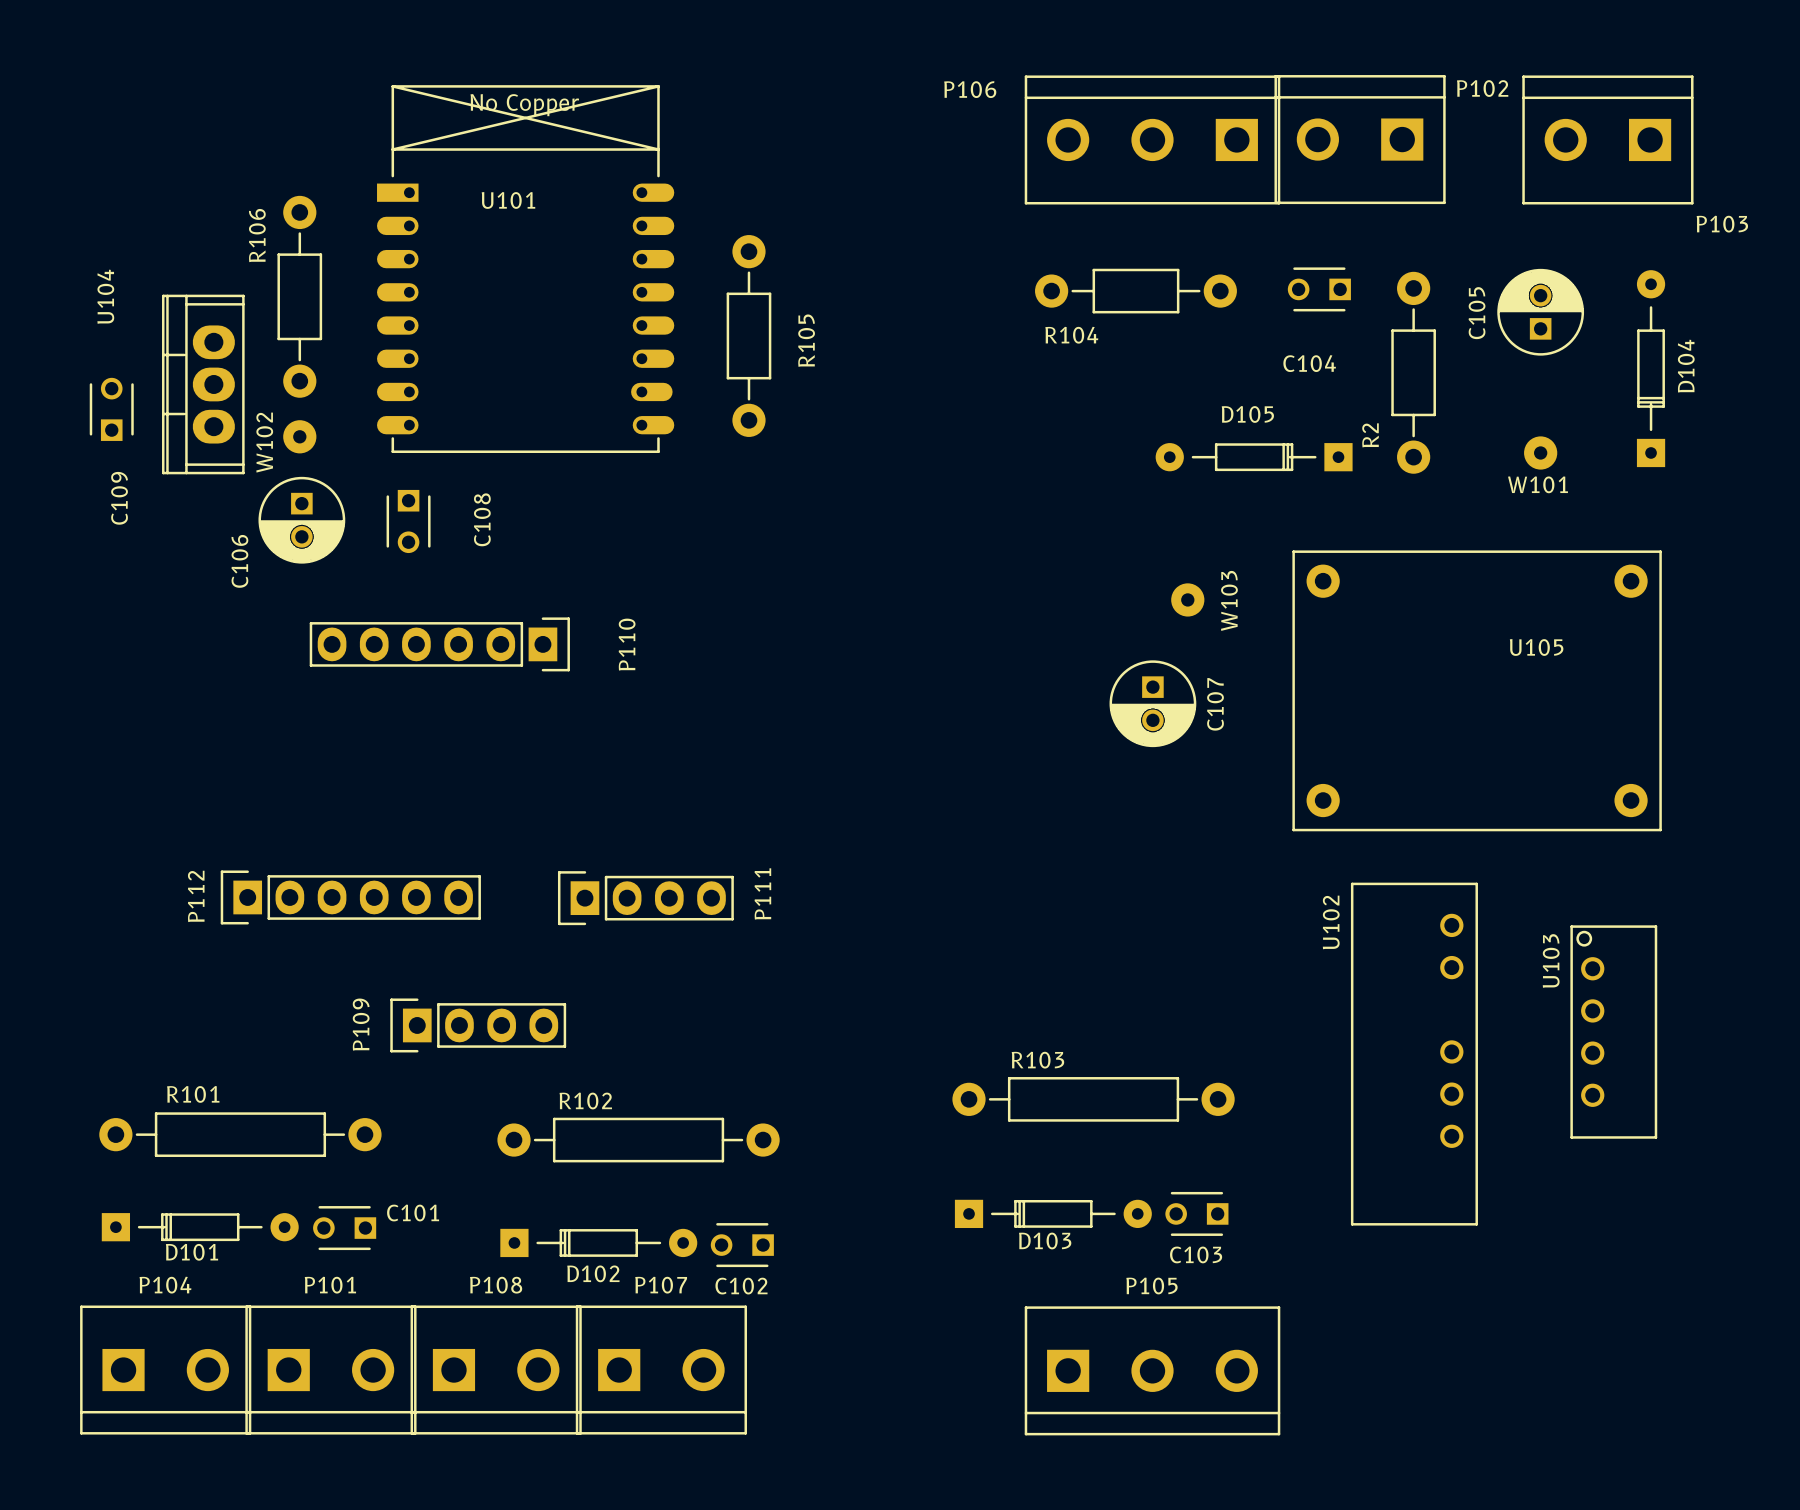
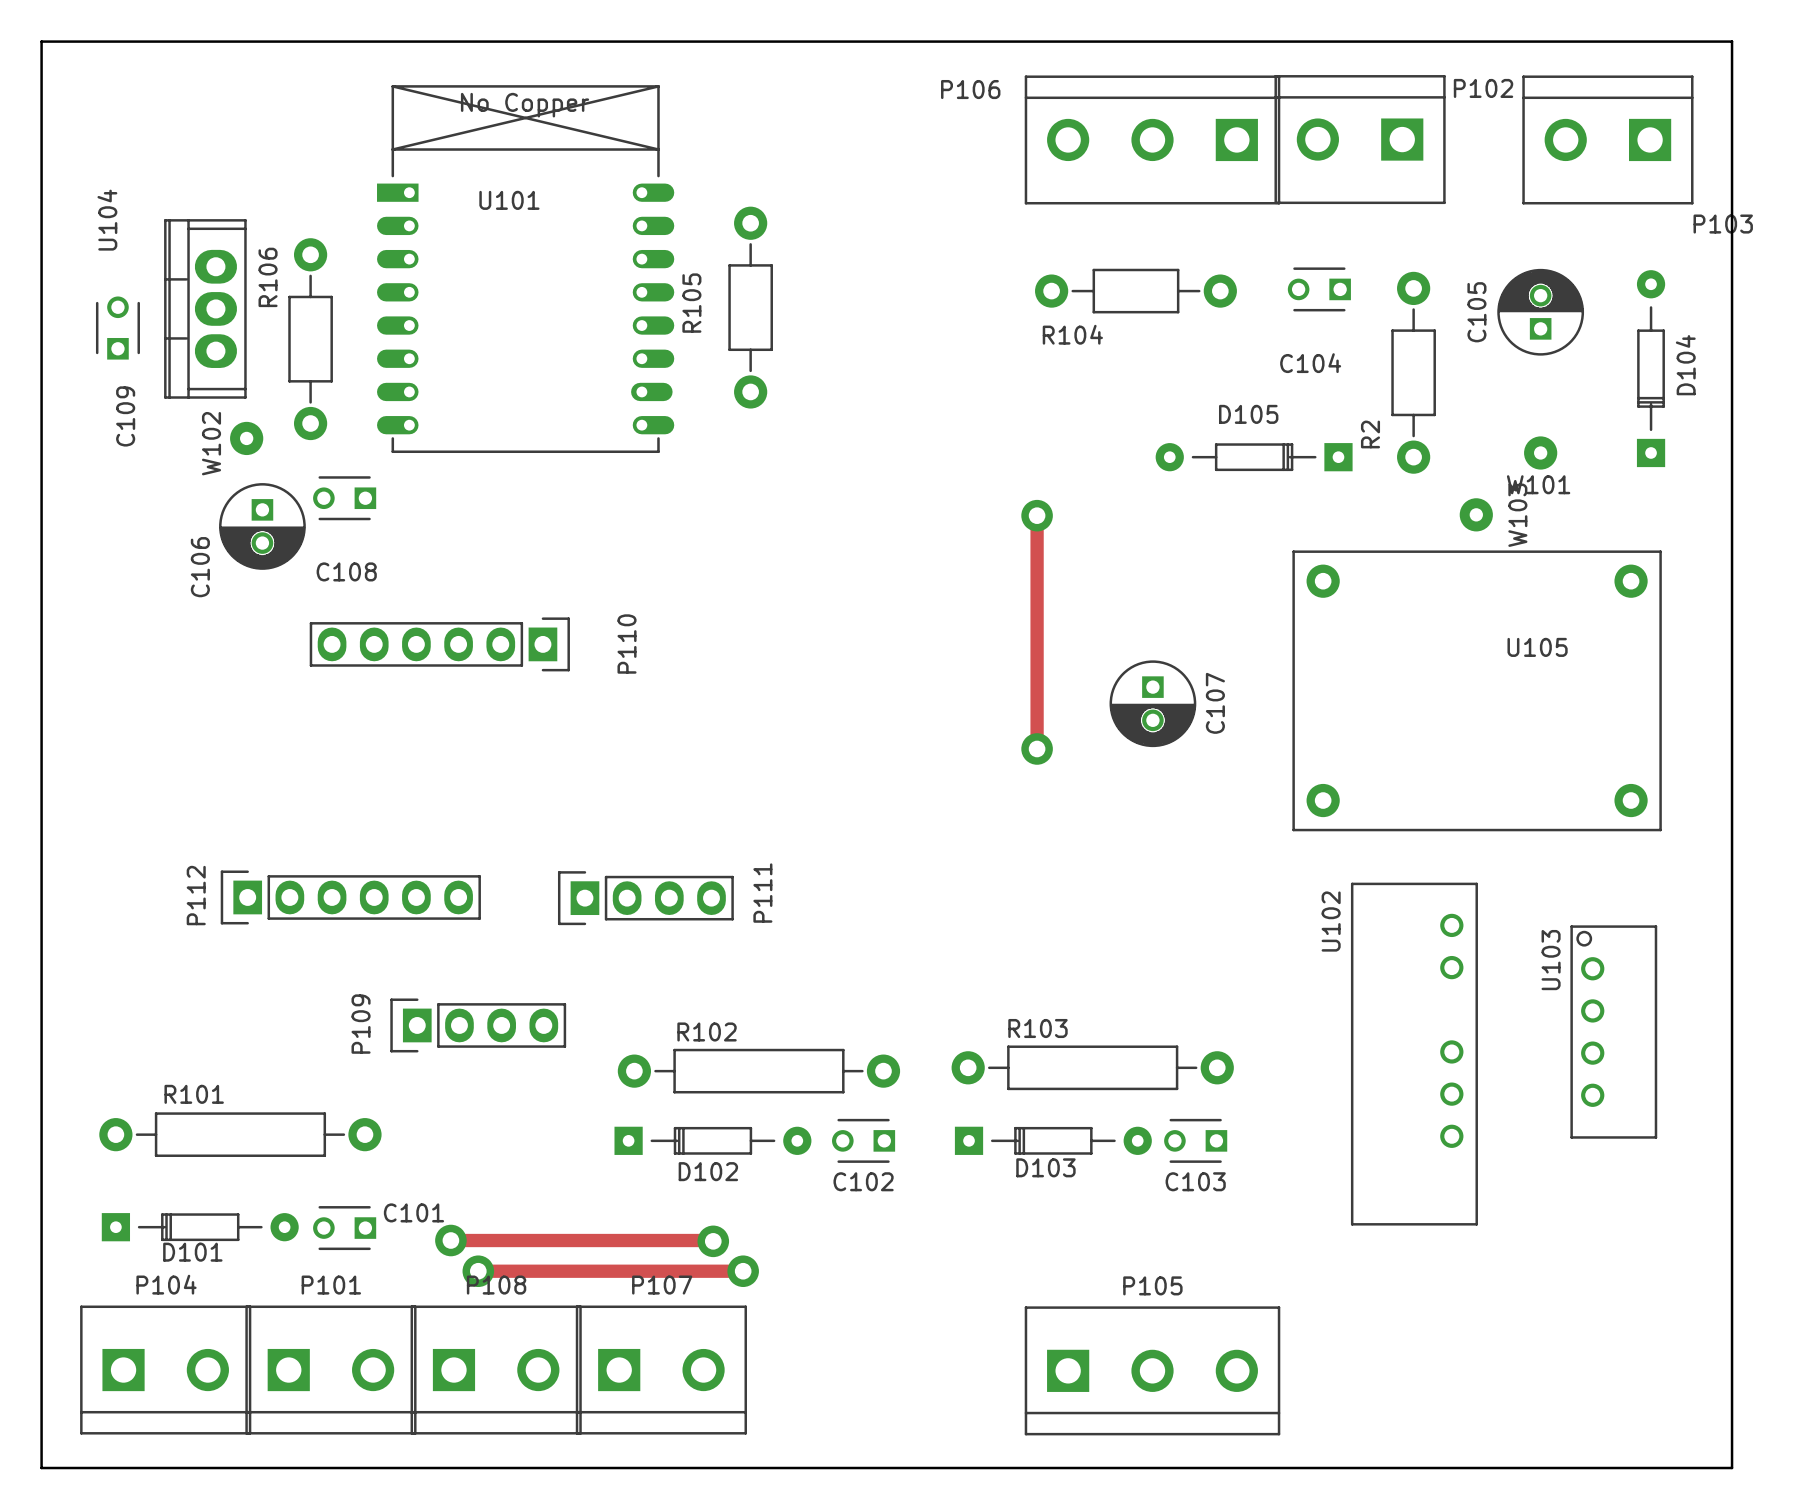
board edge: none -> (41, 41) (41, 1468) (1732, 1468) (1732, 41) (41, 41)
R106 position: (299, 296) -> (310, 339)
R105 position: (748, 336) -> (750, 307)
R105 name position: R105 (806, 340) -> R105 (691, 303)
U104 position: (203, 384) -> (205, 308)
C109 position: (111, 409) -> (117, 328)
W102 position: (299, 436) -> (246, 438)
track: none -> (1037, 515) (1037, 748)
via: none -> (1037, 515)
C106 position: (301, 520) -> (262, 526)
C108 rotation: 0° (408, 521) -> 90° clockwise (344, 498)
C108 position: (408, 521) -> (344, 498)
W103 position: (1187, 599) -> (1476, 514)
via: none -> (1037, 748)
R103 position: (1093, 1099) -> (1092, 1067)
R102 position: (638, 1140) -> (758, 1071)
D103 position: (1053, 1213) -> (1053, 1140)
C103 position: (1196, 1213) -> (1195, 1140)
track: none -> (450, 1240) (713, 1241)
via: none -> (450, 1240)
via: none -> (713, 1241)
D102 position: (598, 1242) -> (712, 1140)
C102 position: (742, 1245) -> (863, 1140)
track: none -> (478, 1271) (743, 1271)
via: none -> (478, 1271)
via: none -> (743, 1271)

